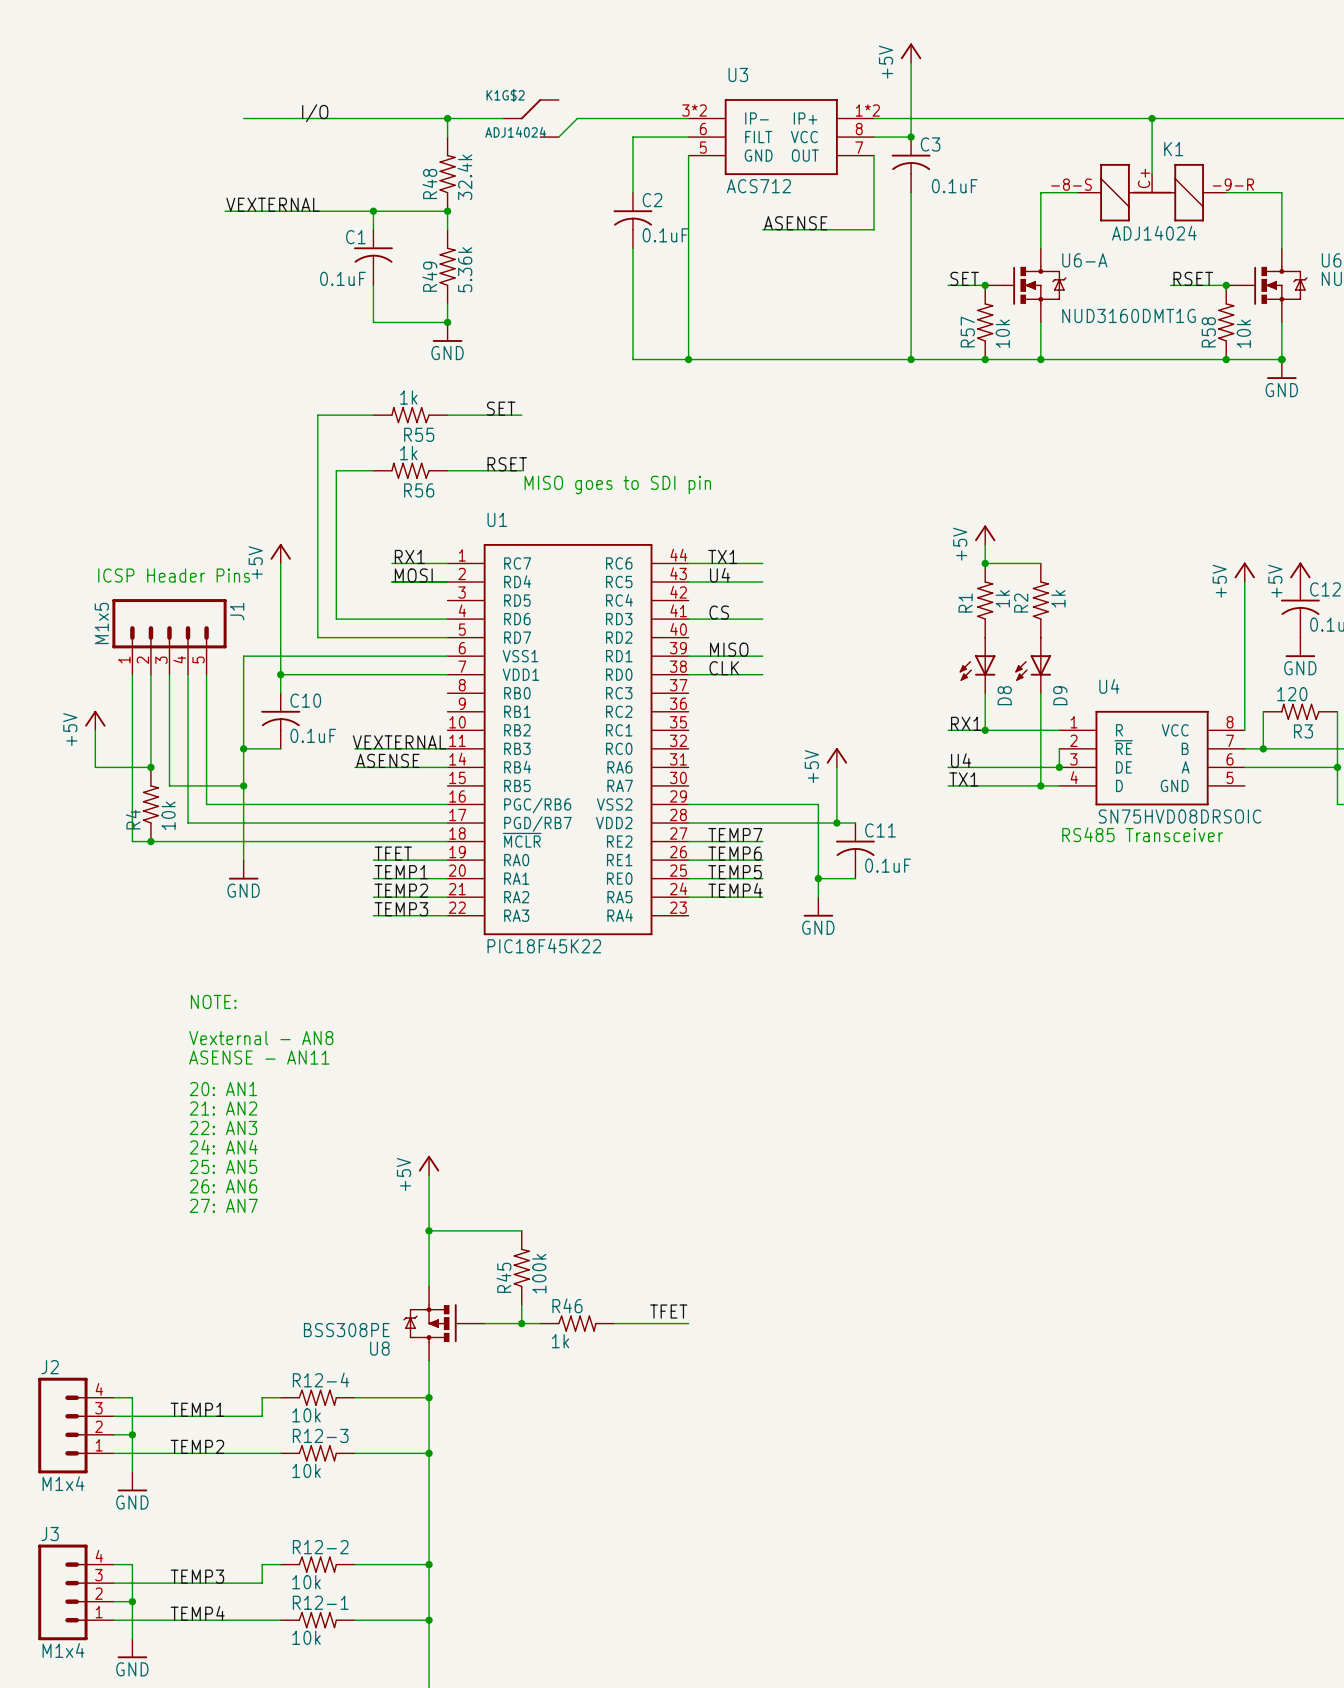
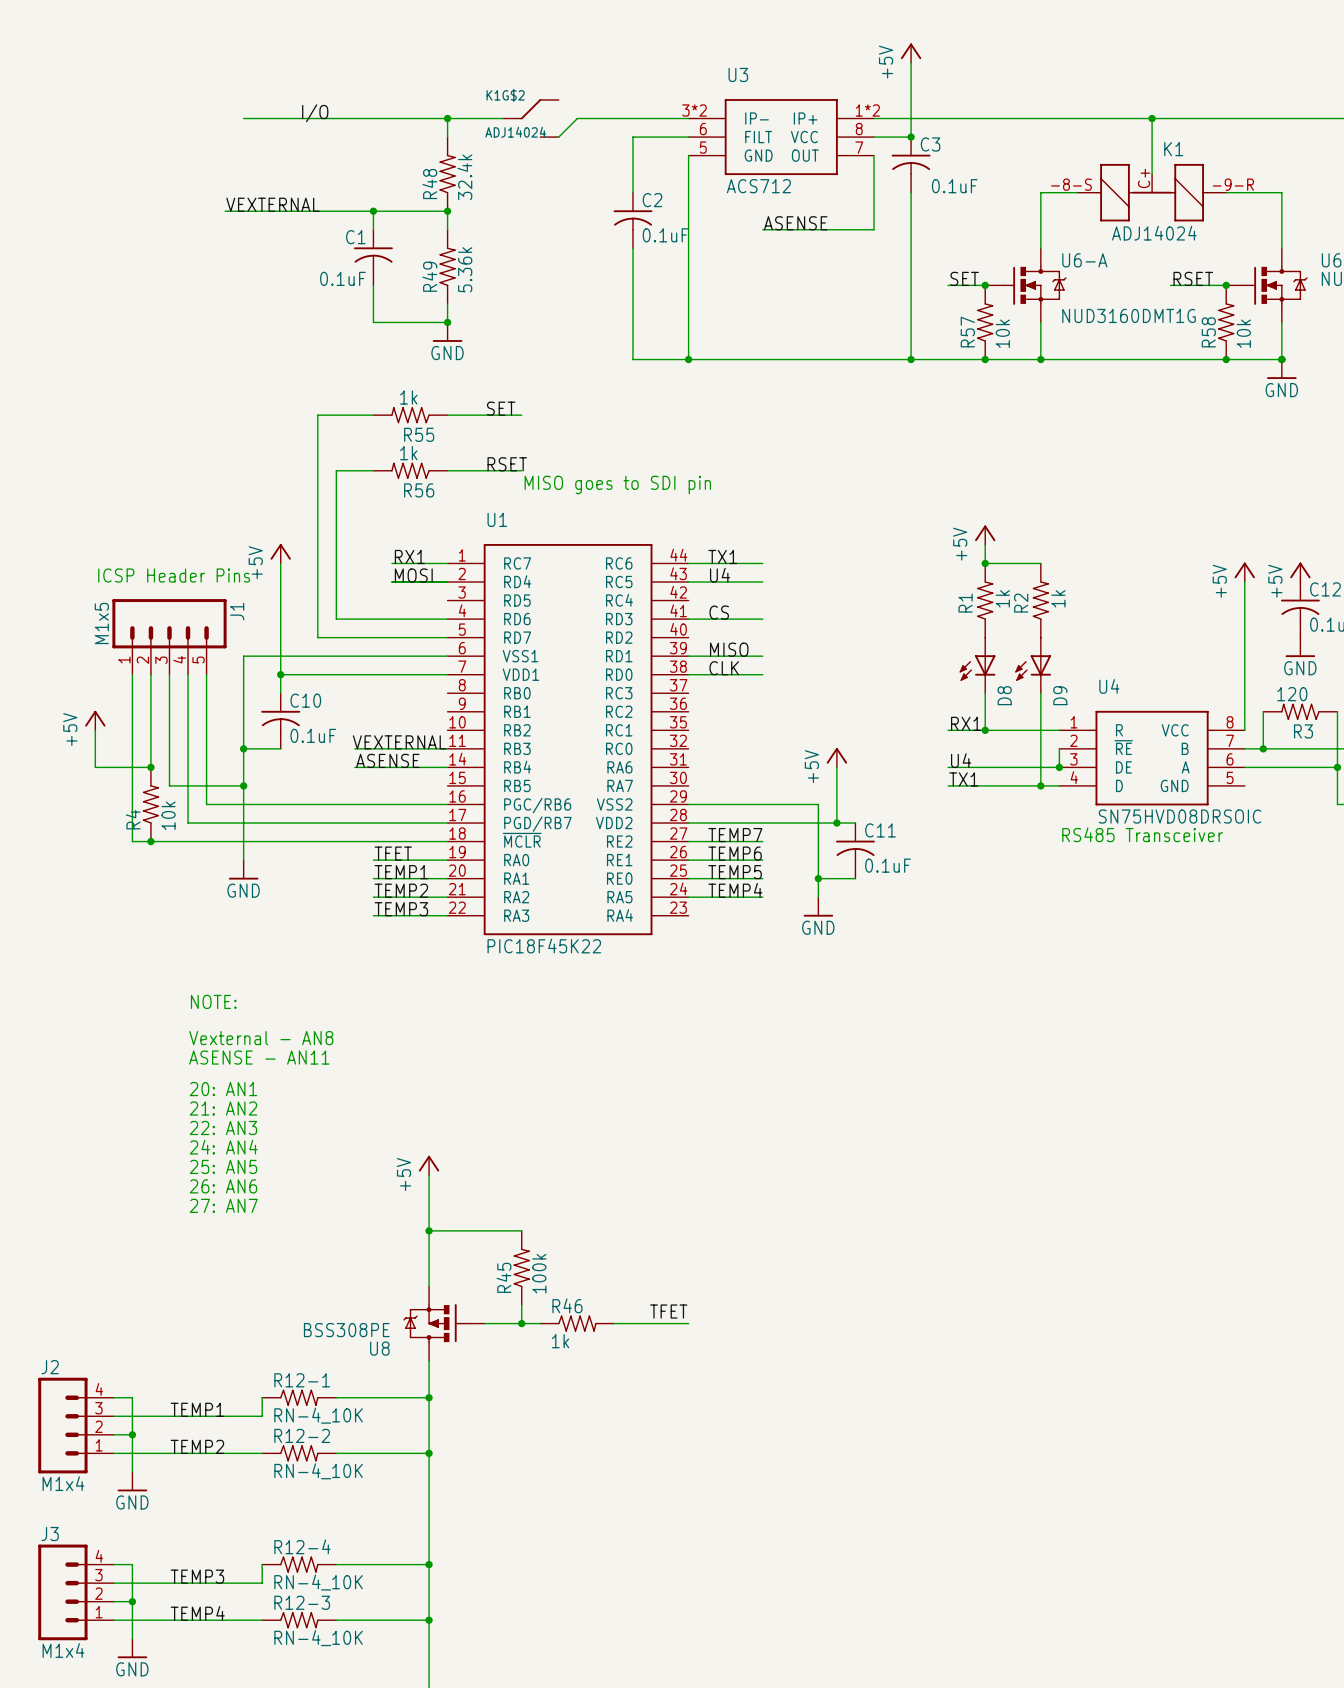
R12-4 position: (317, 1397) -> (299, 1564)
R12-4 value: 10k (306, 1415) -> RN-4_10K (318, 1582)
R12-3 position: (317, 1453) -> (299, 1620)
R12-3 value: 10k (306, 1470) -> RN-4_10K (318, 1638)
R12-2 position: (317, 1564) -> (299, 1453)
R12-2 value: 10k (306, 1582) -> RN-4_10K (318, 1471)
R12-1 position: (317, 1620) -> (299, 1397)
R12-1 value: 10k (306, 1637) -> RN-4_10K (318, 1415)

